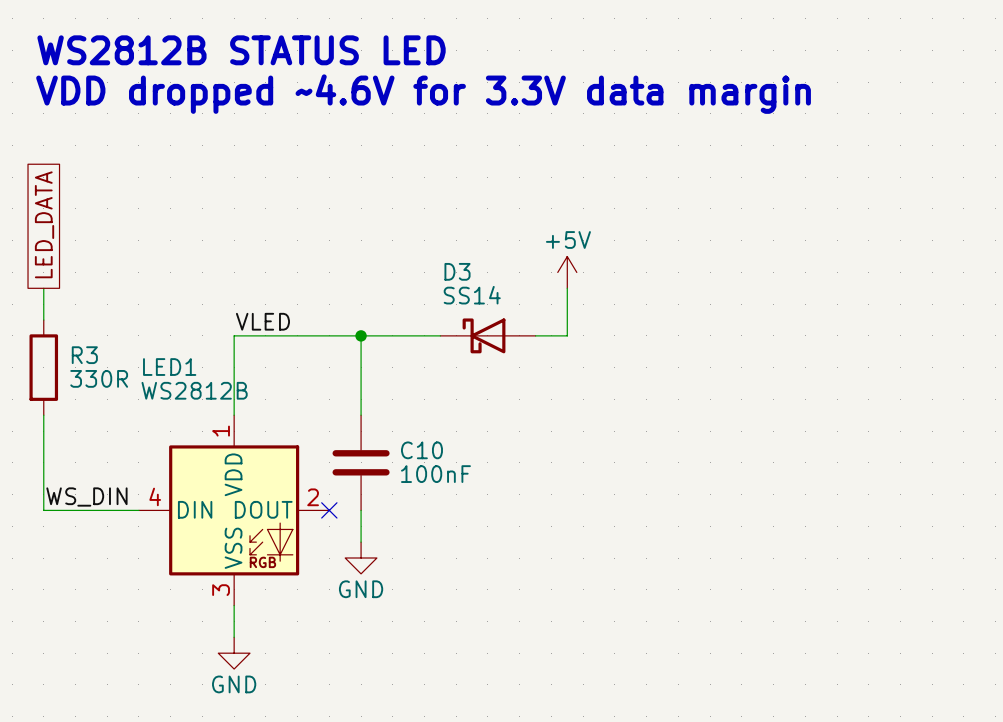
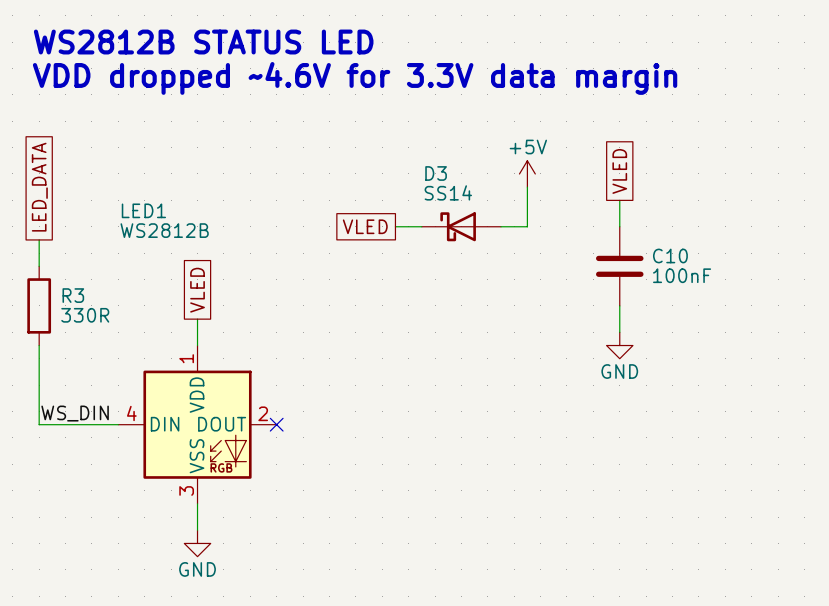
global label: none -> VLED (619, 171)
wire: none -> (619, 200) (619, 226)
global label: none -> VLED (365, 226)
wire: none -> (395, 226) (421, 226)
power symbol position: +5V (567, 272) -> +5V (527, 173)
wire: (567, 288) (567, 335) (535, 335) -> (527, 187) (527, 226) (501, 226)
label: VLED (262, 321) -> none
wire: (361, 335) (361, 415) -> none
junction: (361, 335) -> none
wire: (440, 335) (234, 335) (234, 383) -> none
D3 position: (487, 335) -> (461, 226)
global label: none -> VLED (197, 290)
LED1 name position: LED1 (169, 367) -> LED1 (143, 210)
wire: none -> (619, 305) (619, 332)
LED1 value position: WS2812B (194, 390) -> WS2812B (164, 230)
power symbol: none -> GND (619, 345)
C10 position: (361, 462) -> (619, 266)
wire: (361, 510) (361, 542) -> none
power symbol: GND (361, 558) -> none

